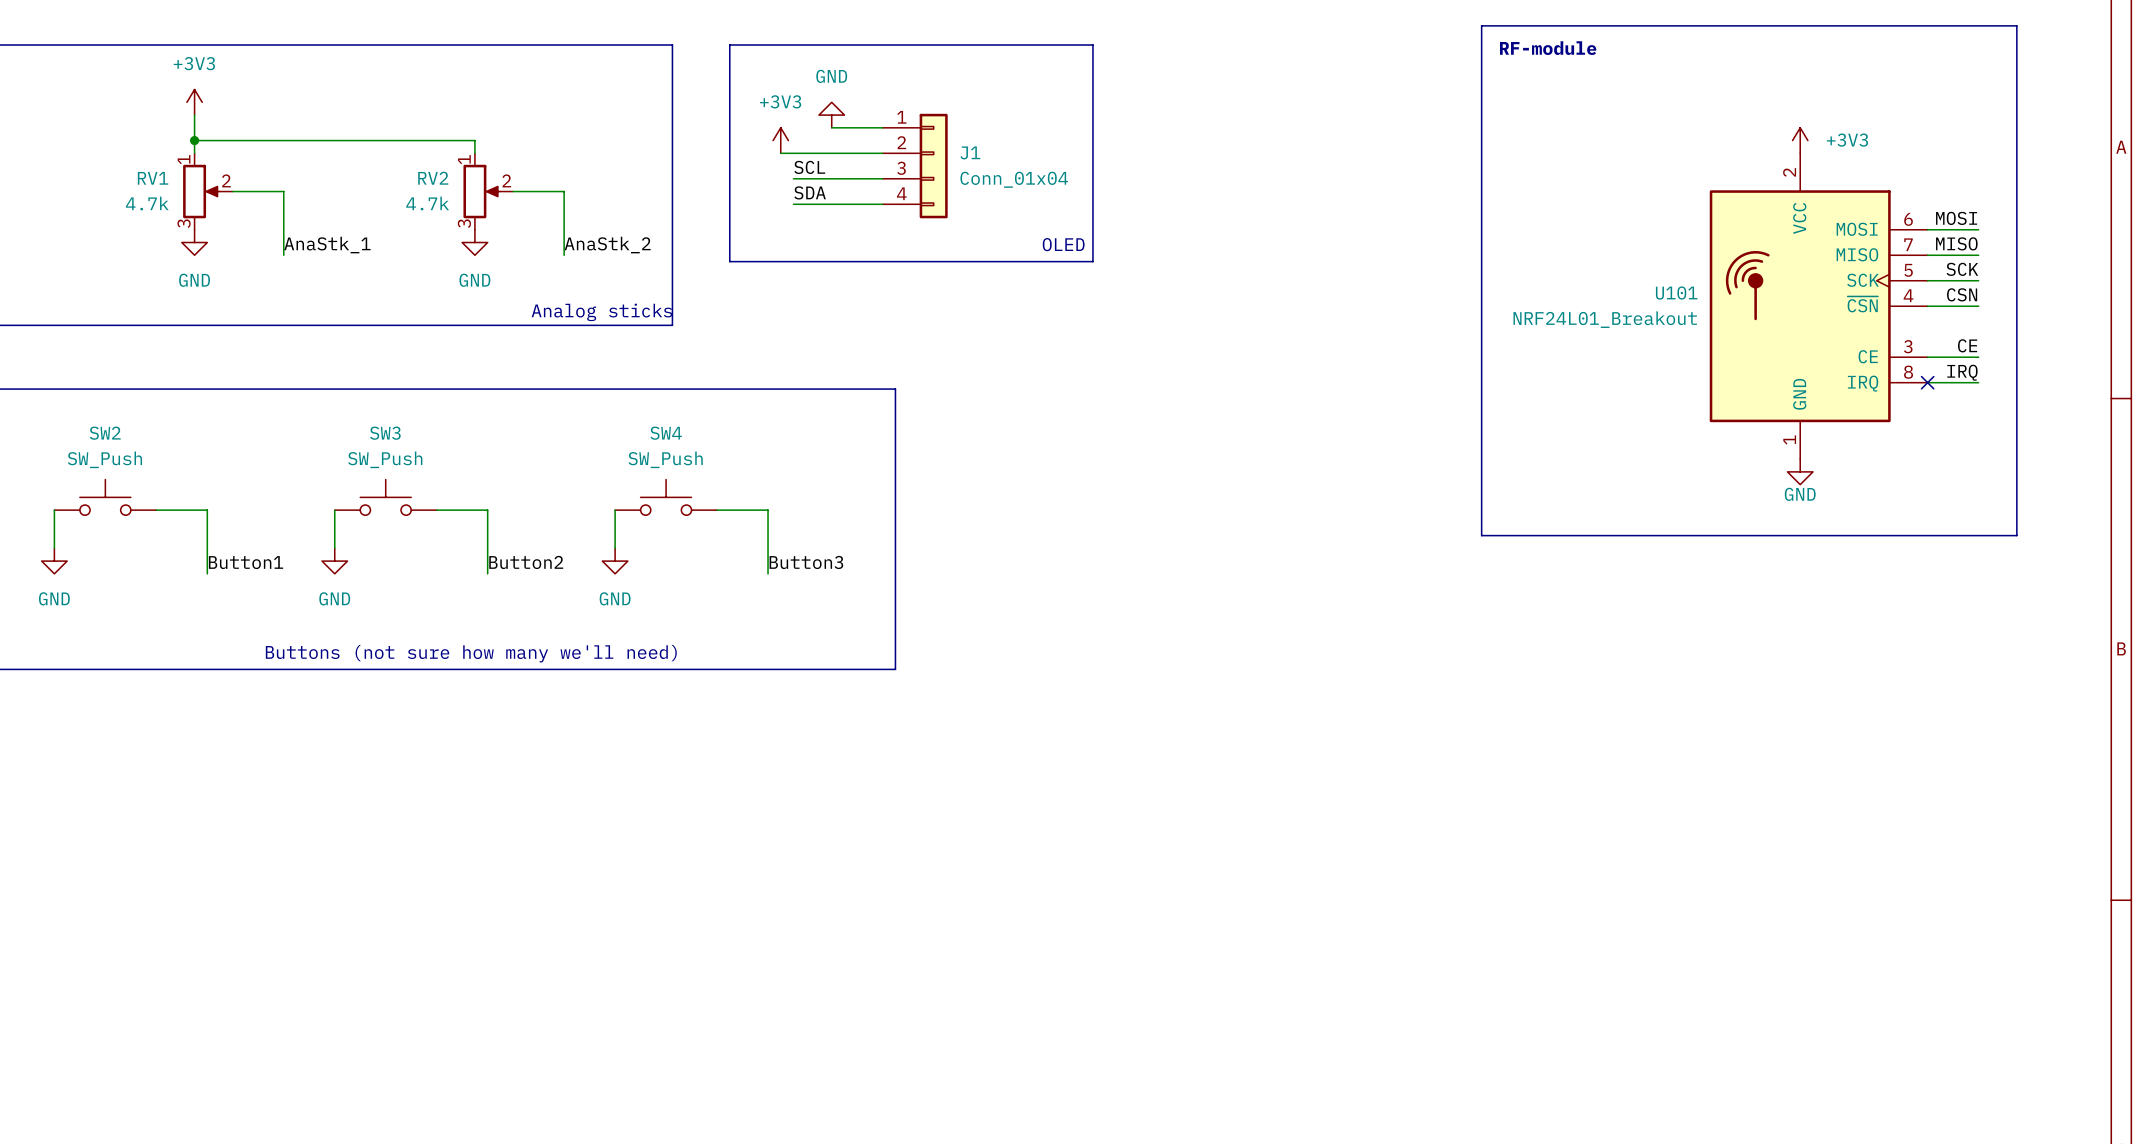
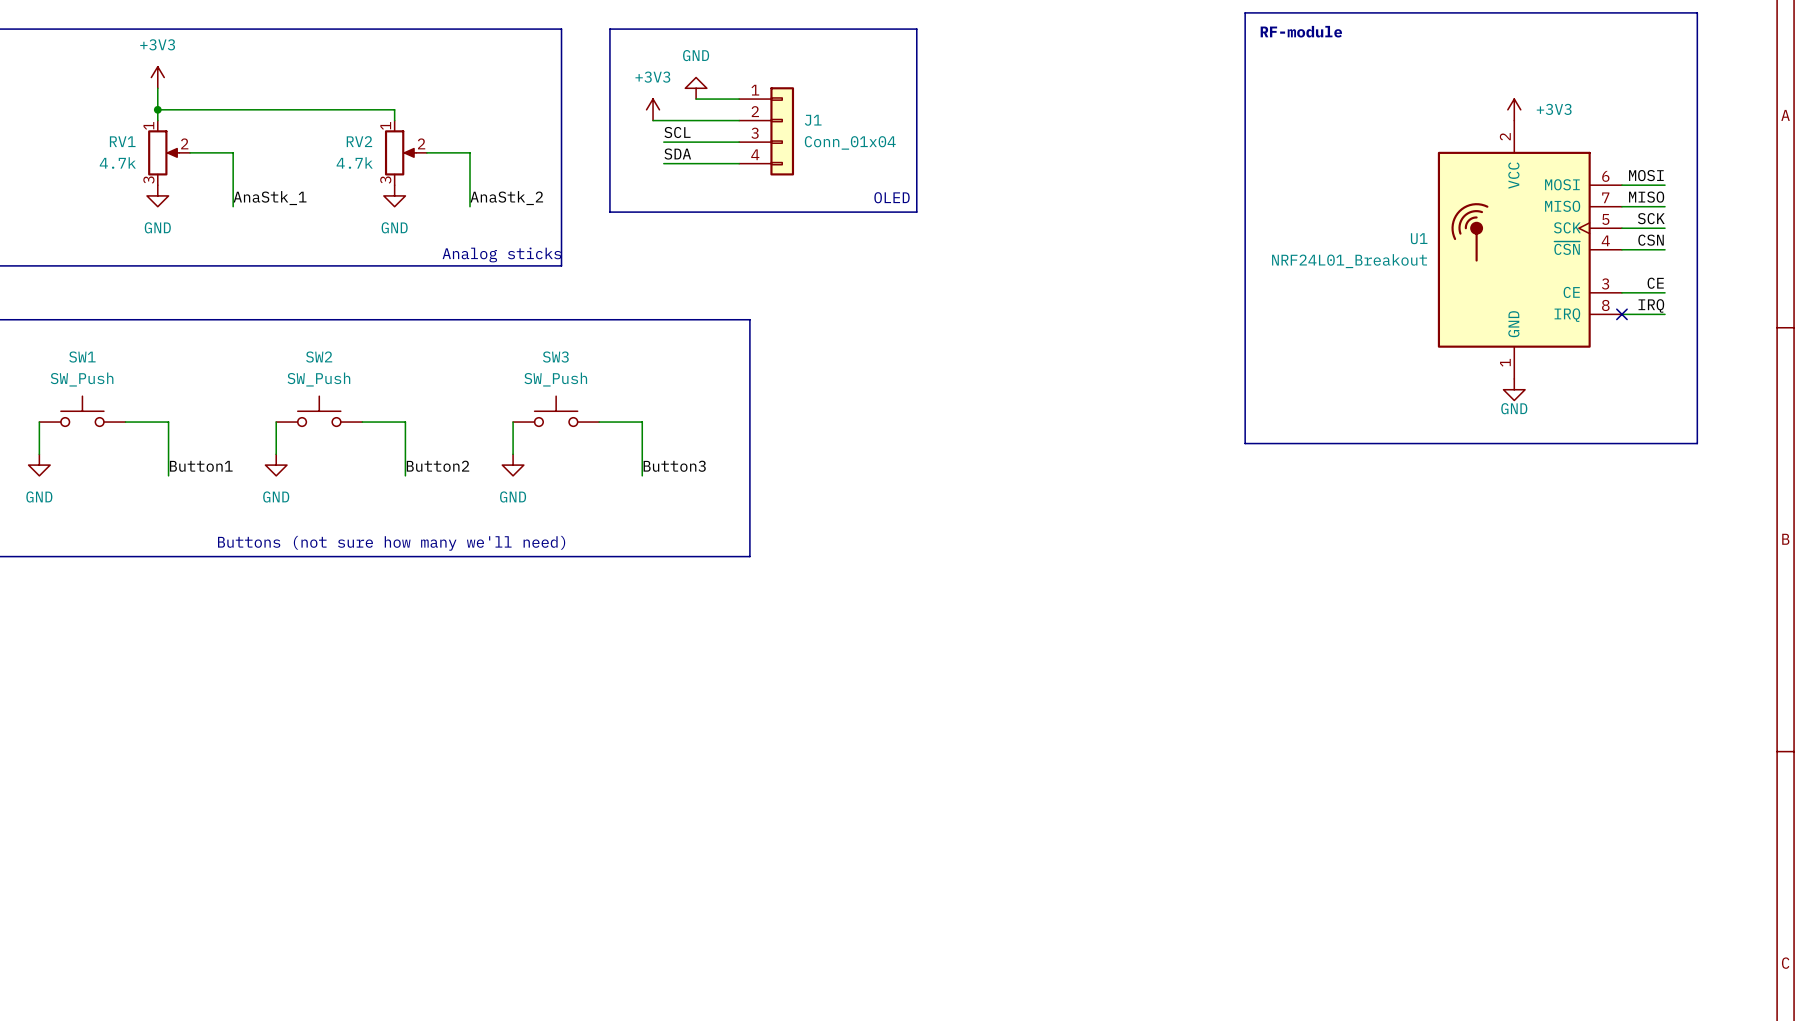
U101 name: U101 (1676, 293) -> U1 (1419, 238)
SW2 name: SW2 (105, 433) -> SW1 (82, 357)
SW3 name: SW3 (385, 433) -> SW2 (319, 357)
SW4 name: SW4 (666, 433) -> SW3 (555, 357)

